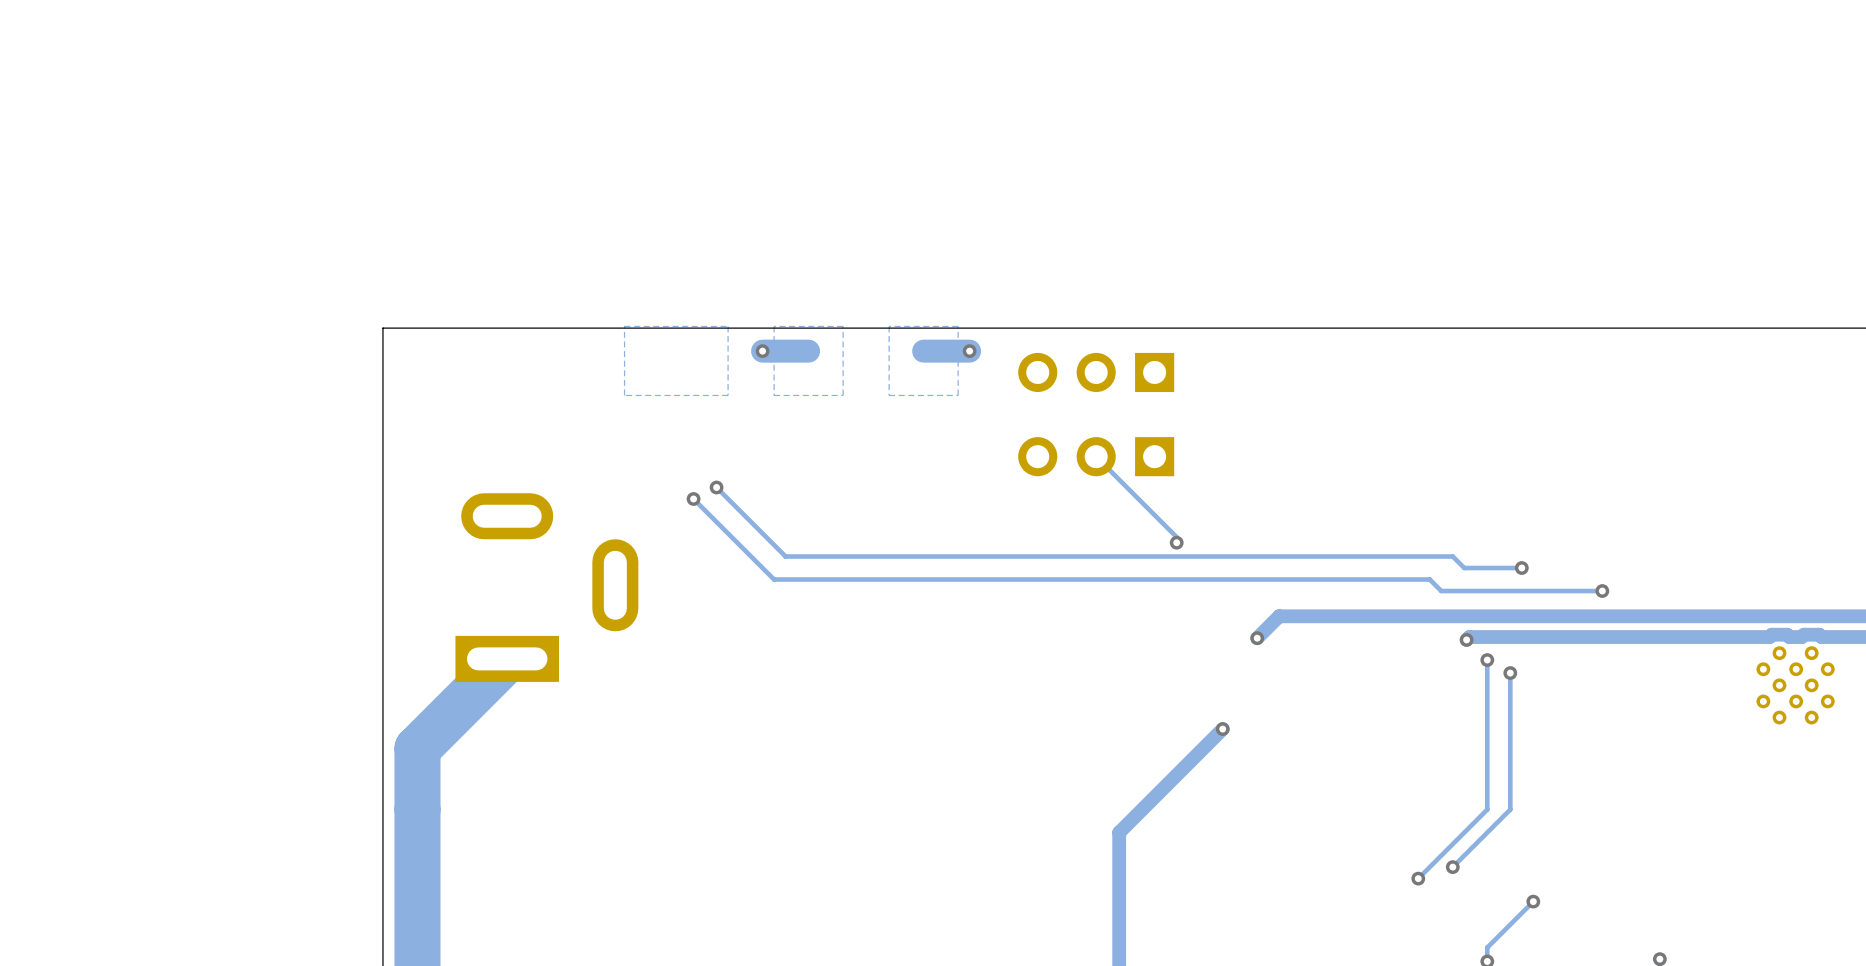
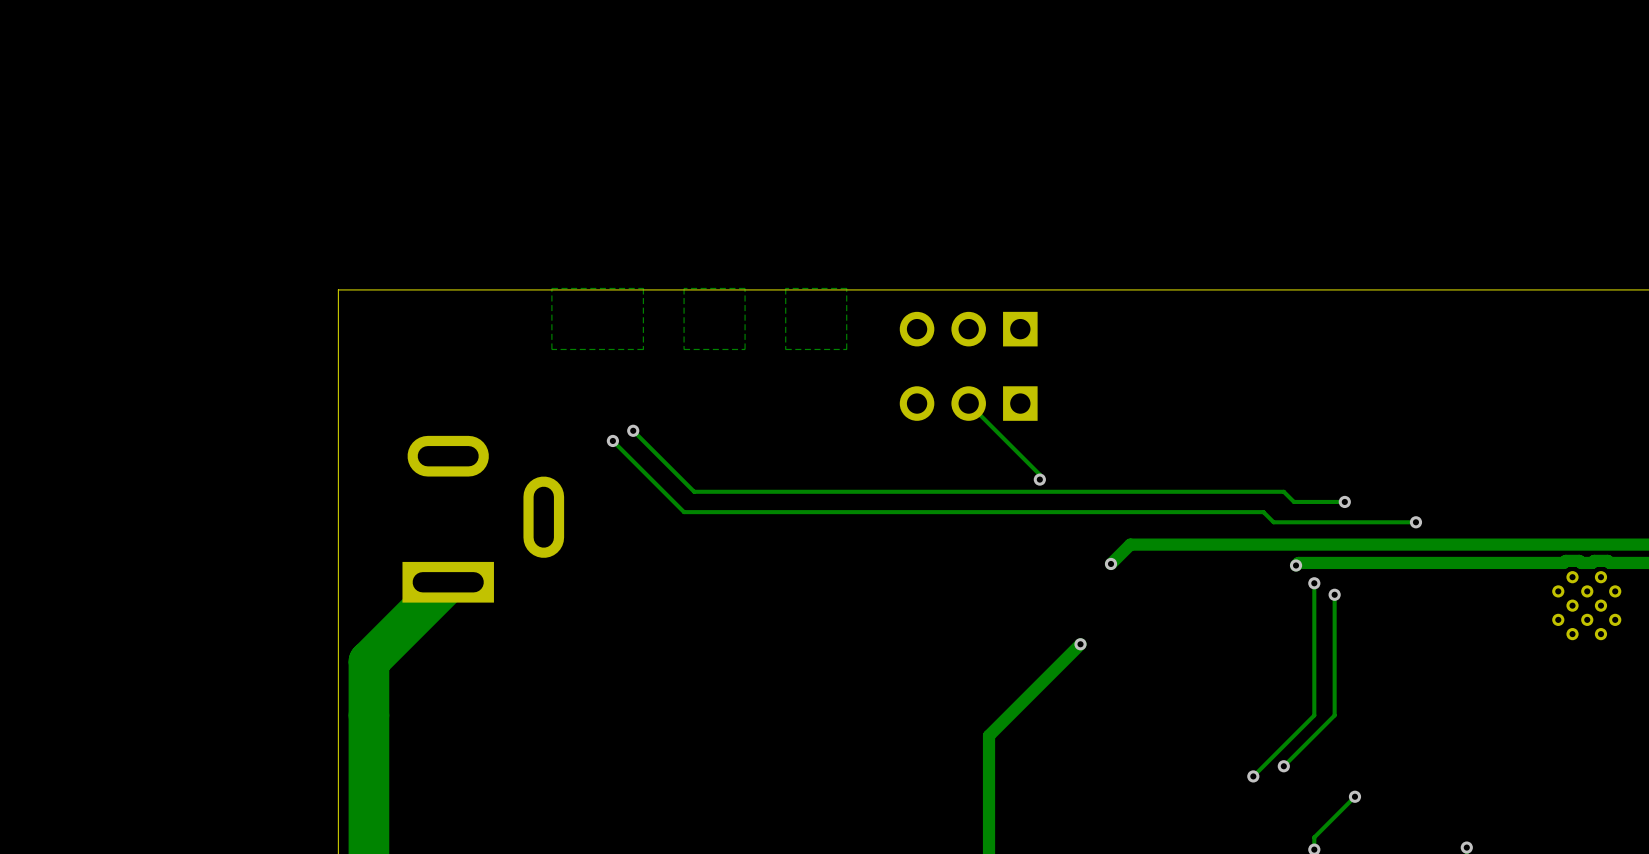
via: (762, 351) -> none
track: (808, 351) (762, 351) -> none
track: (969, 351) (923, 351) -> none
via: (969, 351) -> none

